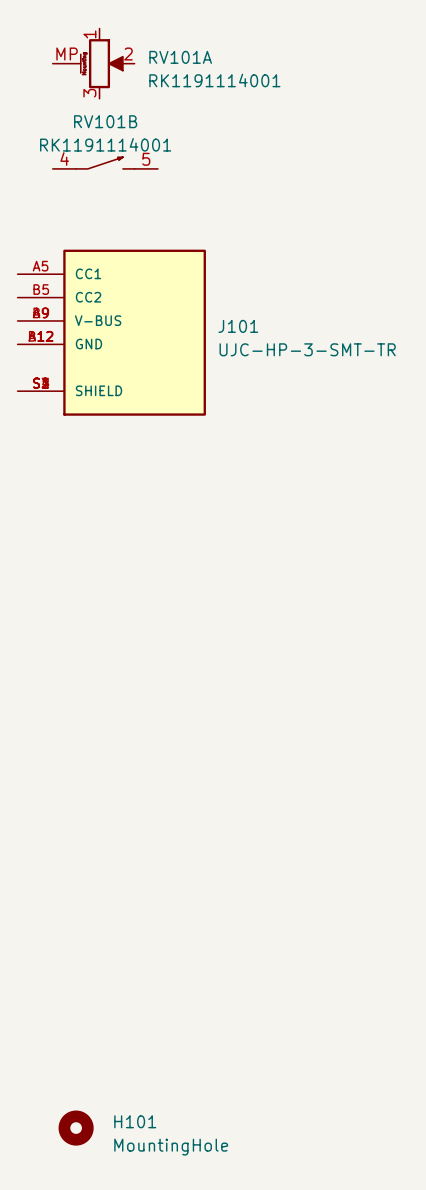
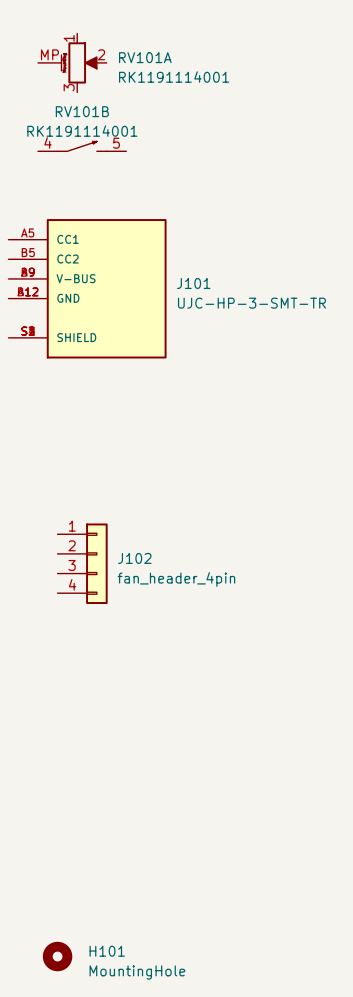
J102: none -> fan_header_4pin (82, 563)

